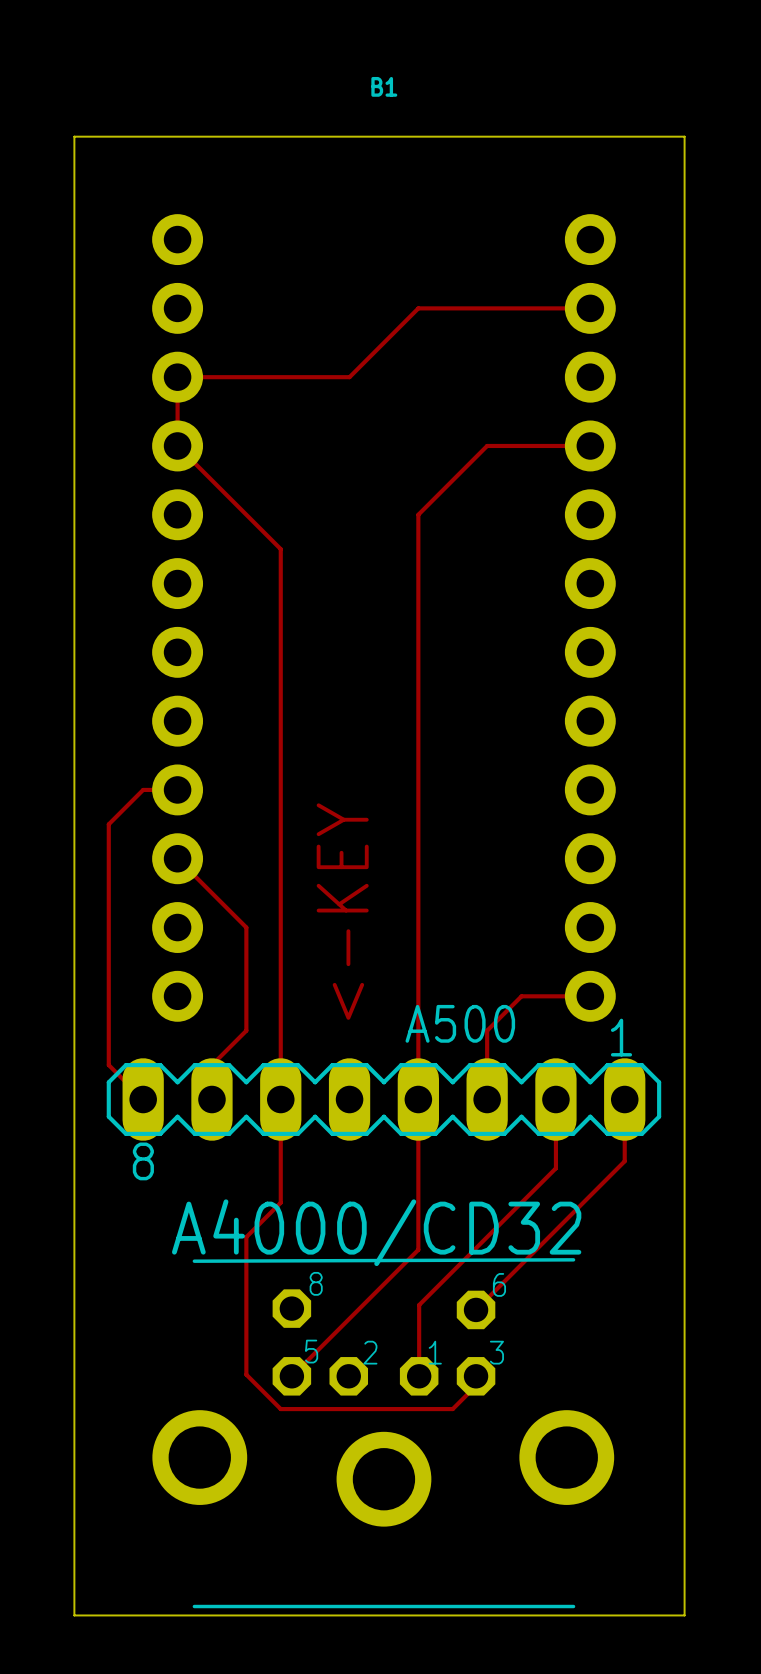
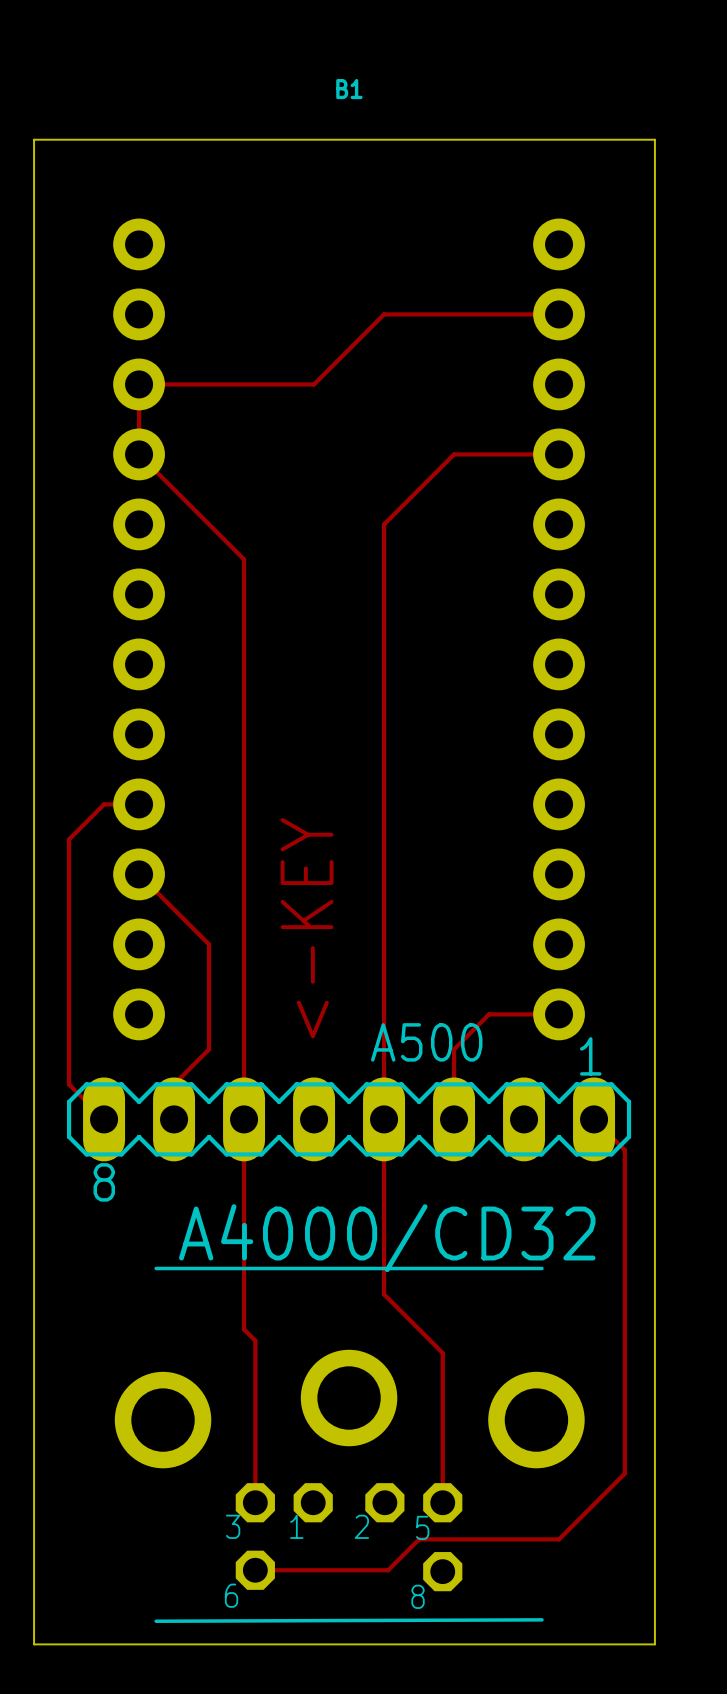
track: (555, 1099) (555, 1168) (419, 1305) (419, 1376) -> none
track: (624, 1099) (624, 1161) (476, 1309) -> (594, 1119) (624, 1150) (624, 1473) (559, 1539) (419, 1539) (388, 1570) (255, 1570)
track: (280, 1202) (246, 1237) (246, 1374) (280, 1409) (452, 1409) (476, 1385) -> (244, 1224) (244, 1329) (255, 1340) (255, 1502)
A4000/CD32 name position: A4000/CD32 (376, 1232) -> A4000/CD32 (387, 1238)
track: (418, 1249) (291, 1376) -> (384, 1272) (384, 1294) (442, 1353) (442, 1401)
A4000/CD32 footprint: [152, 1258, 615, 1609] -> [114, 1266, 585, 1623]
track: none -> (442, 1410) (442, 1502)

